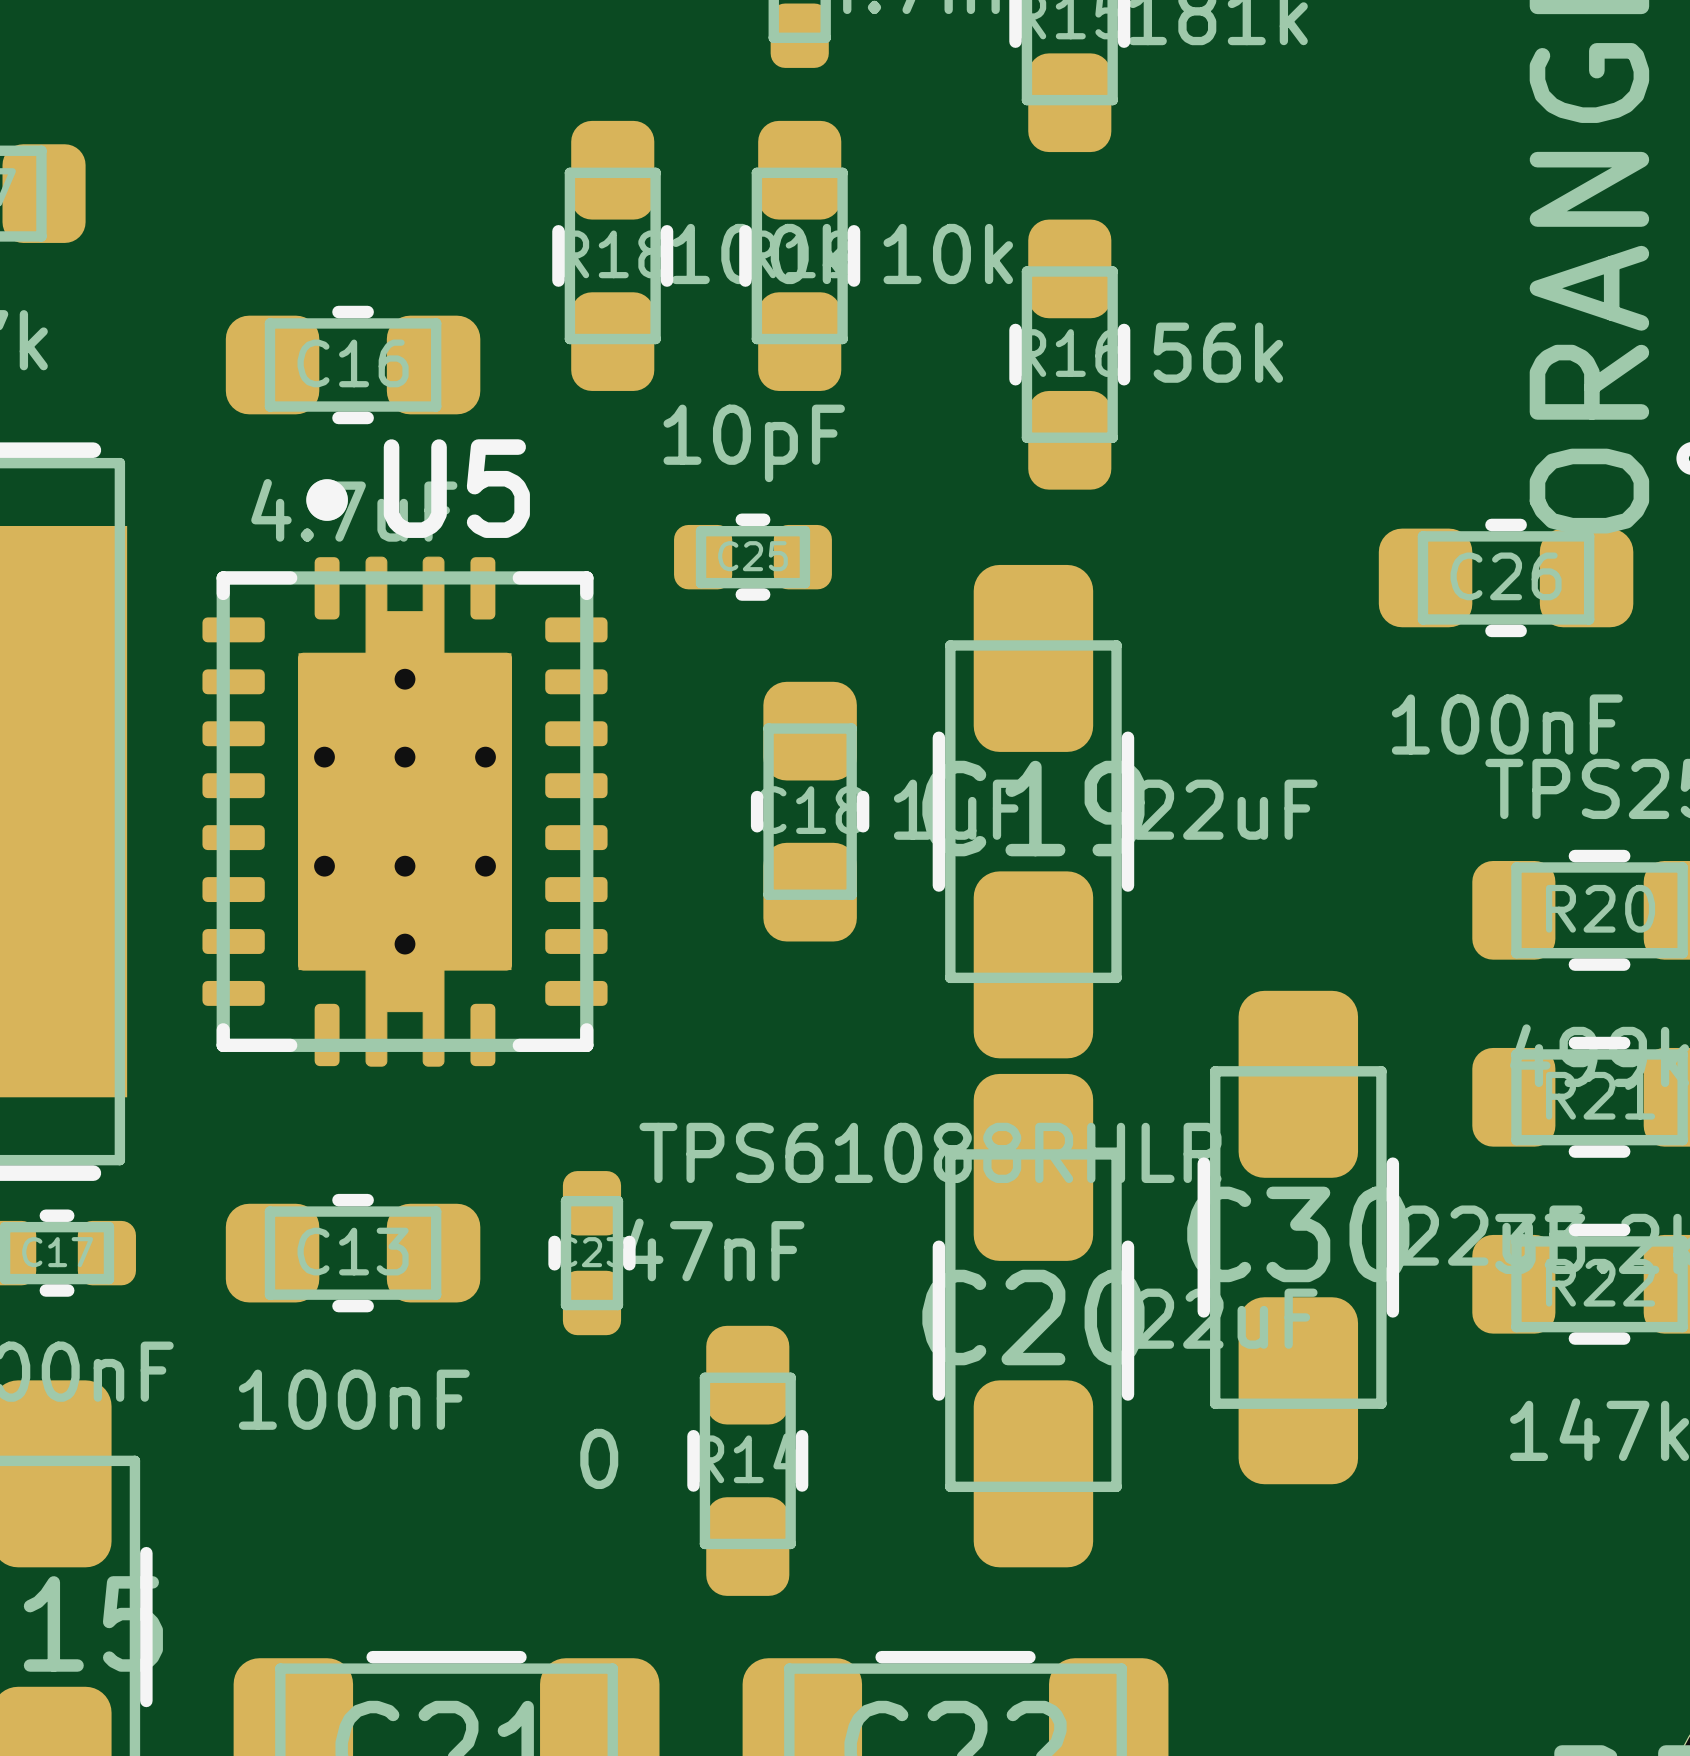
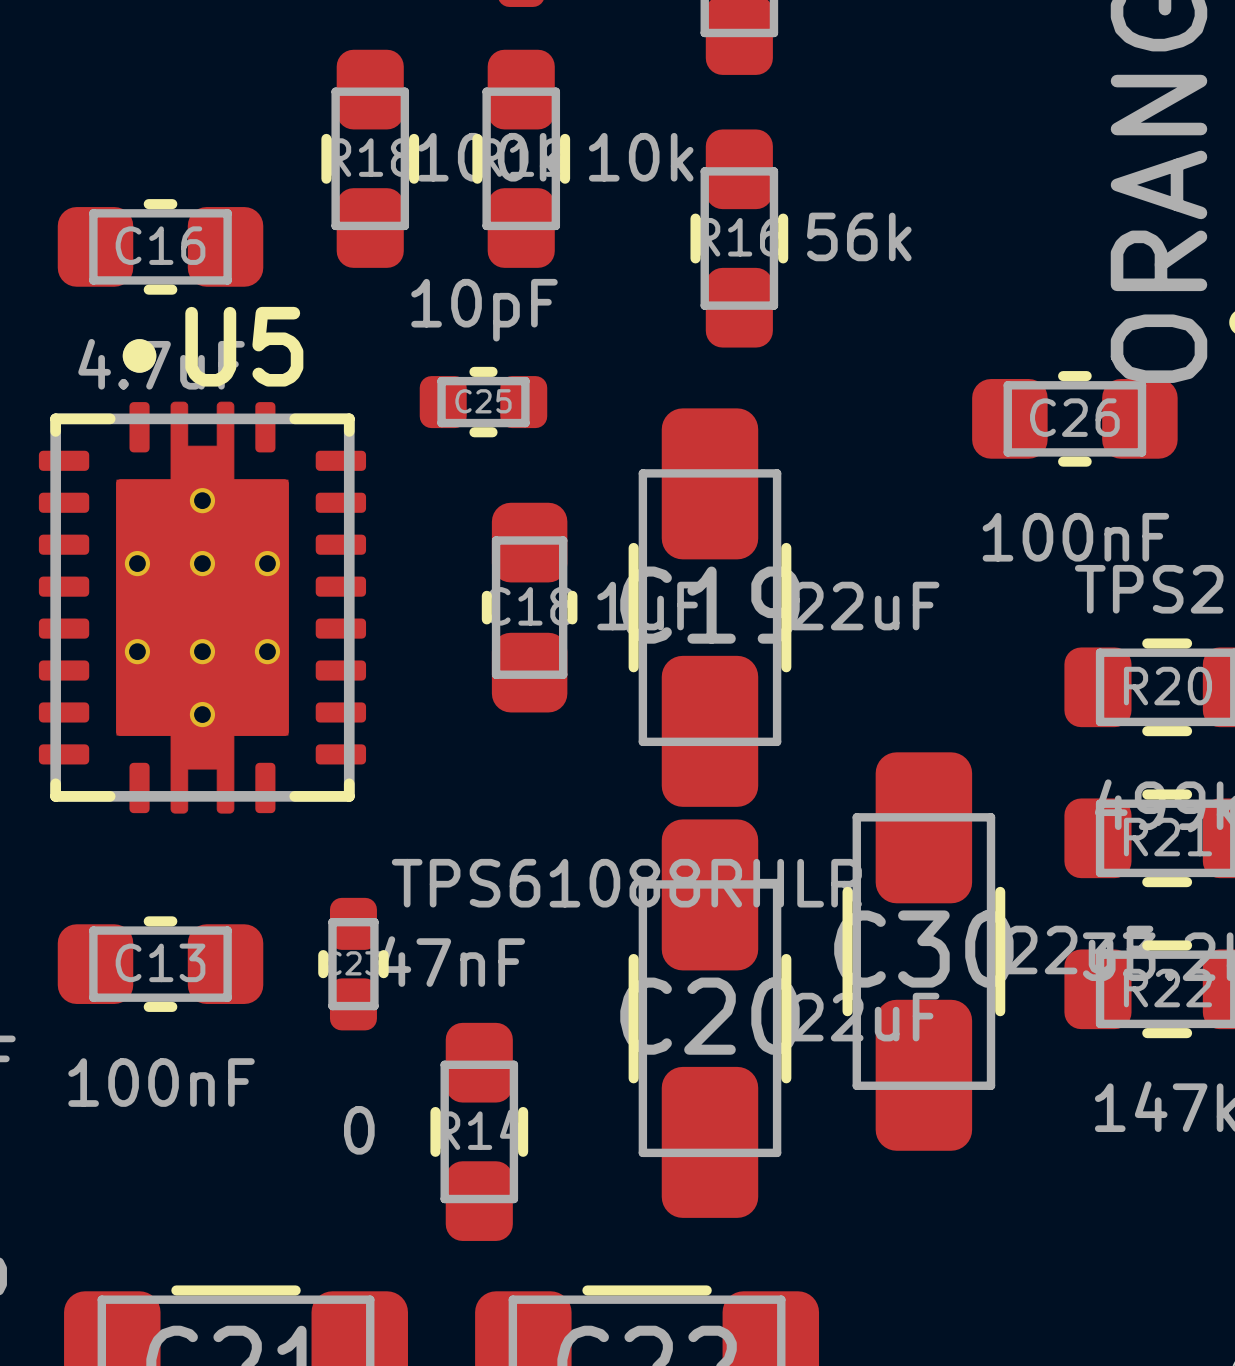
C26 position: (1506, 577) -> (1074, 418)

